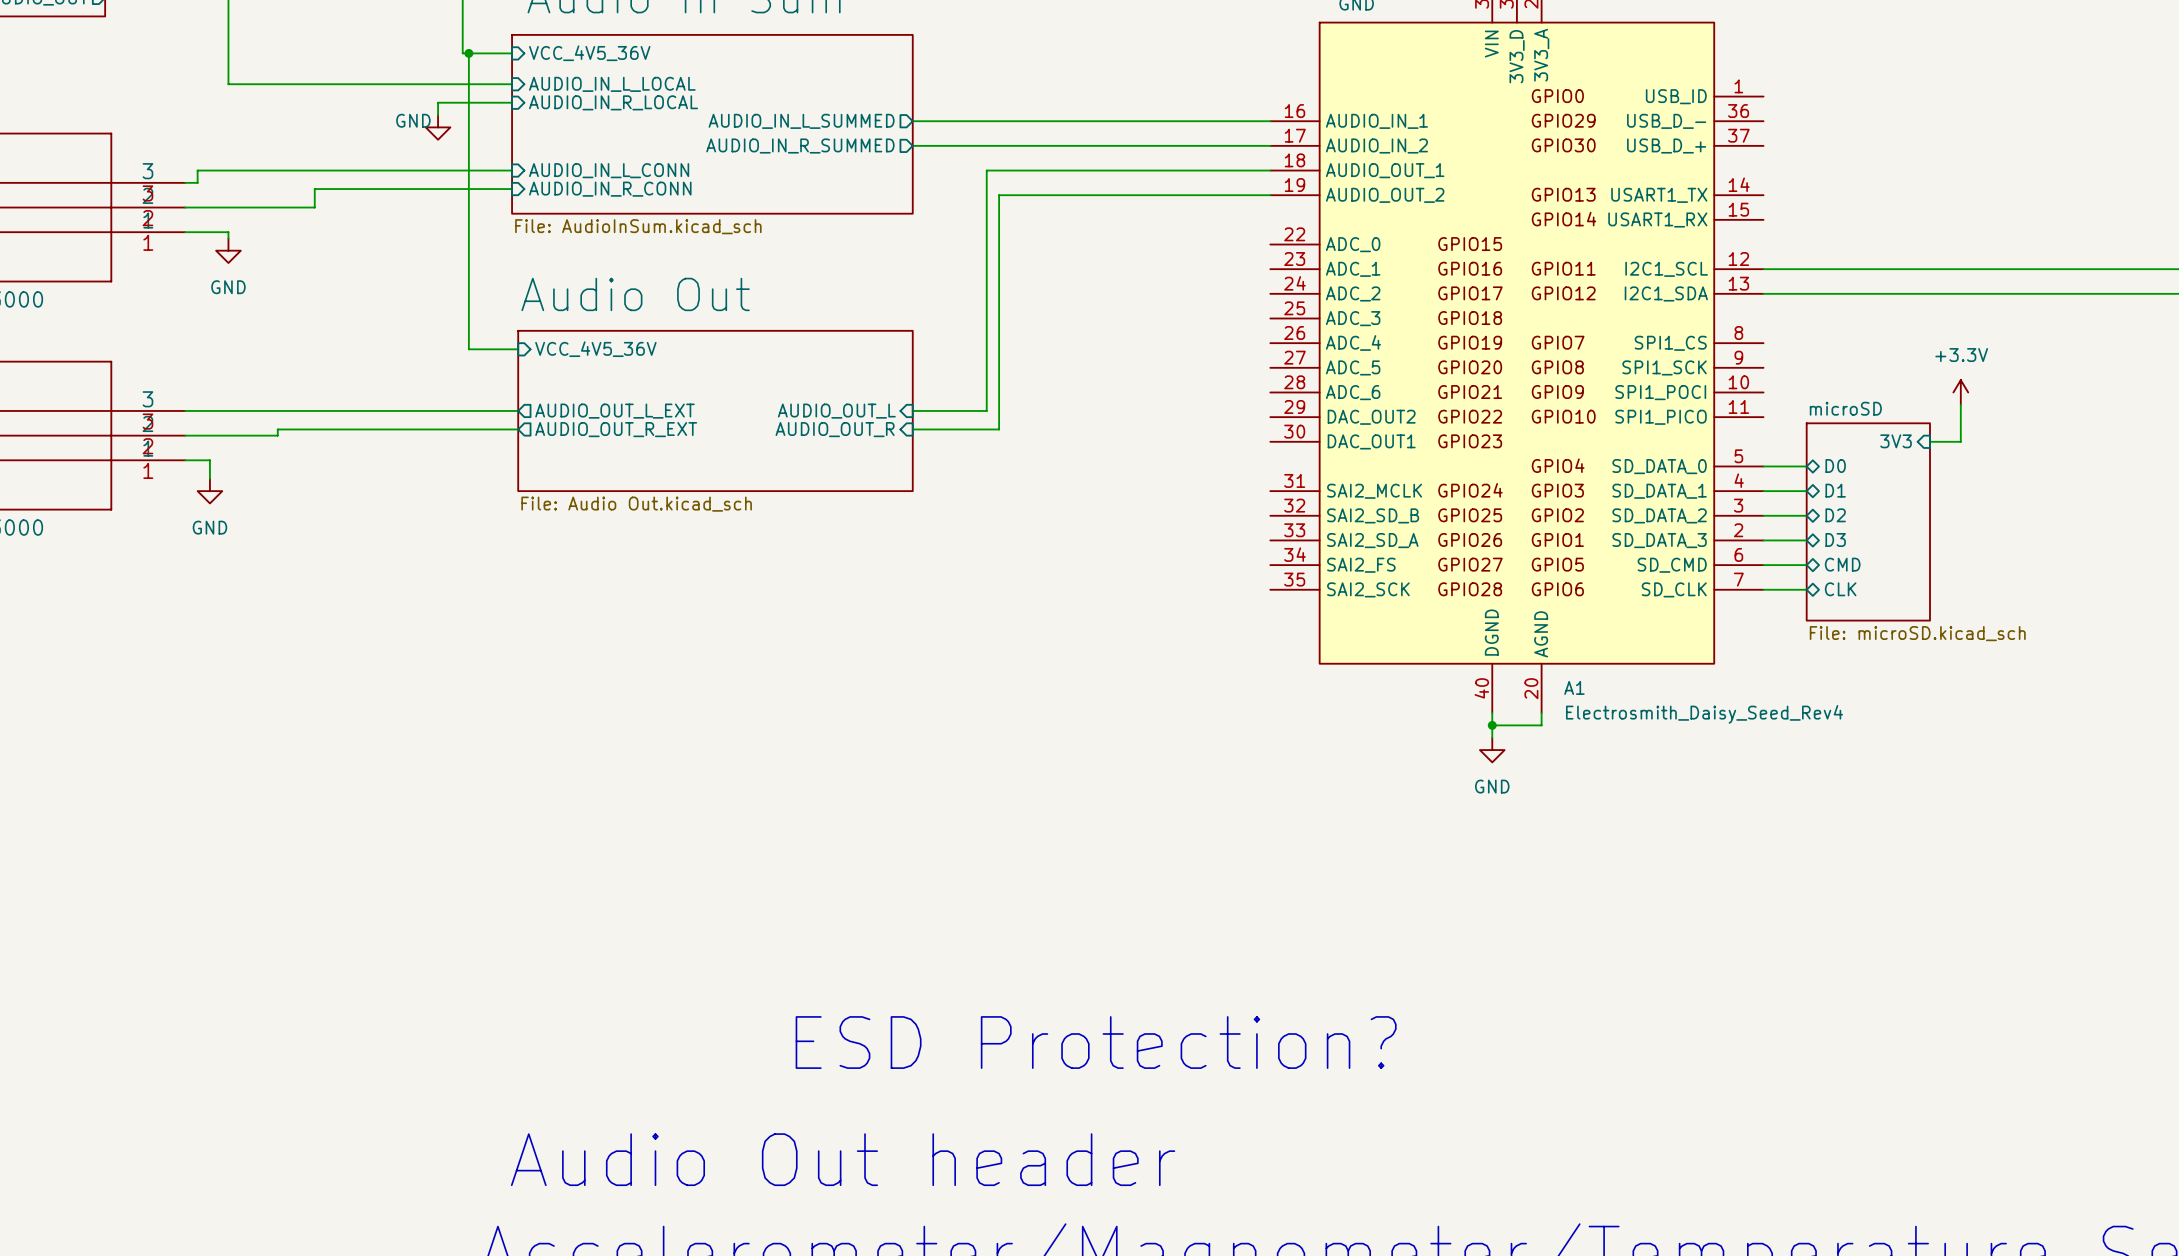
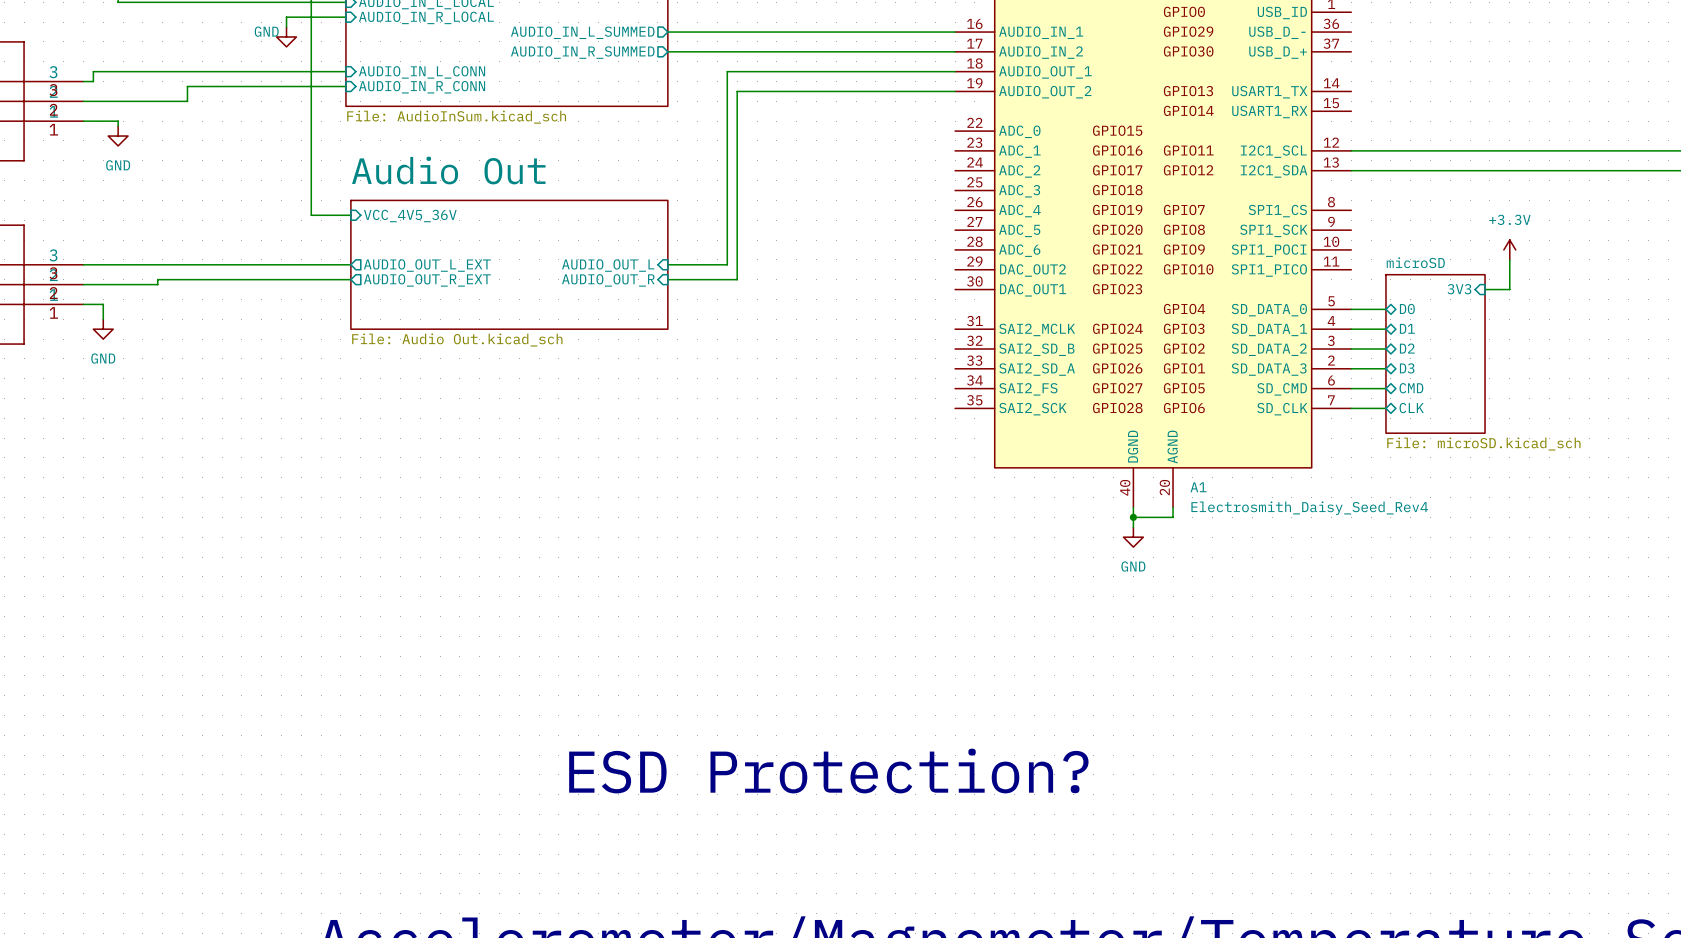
text: Audio Out header (843, 1159) -> none

